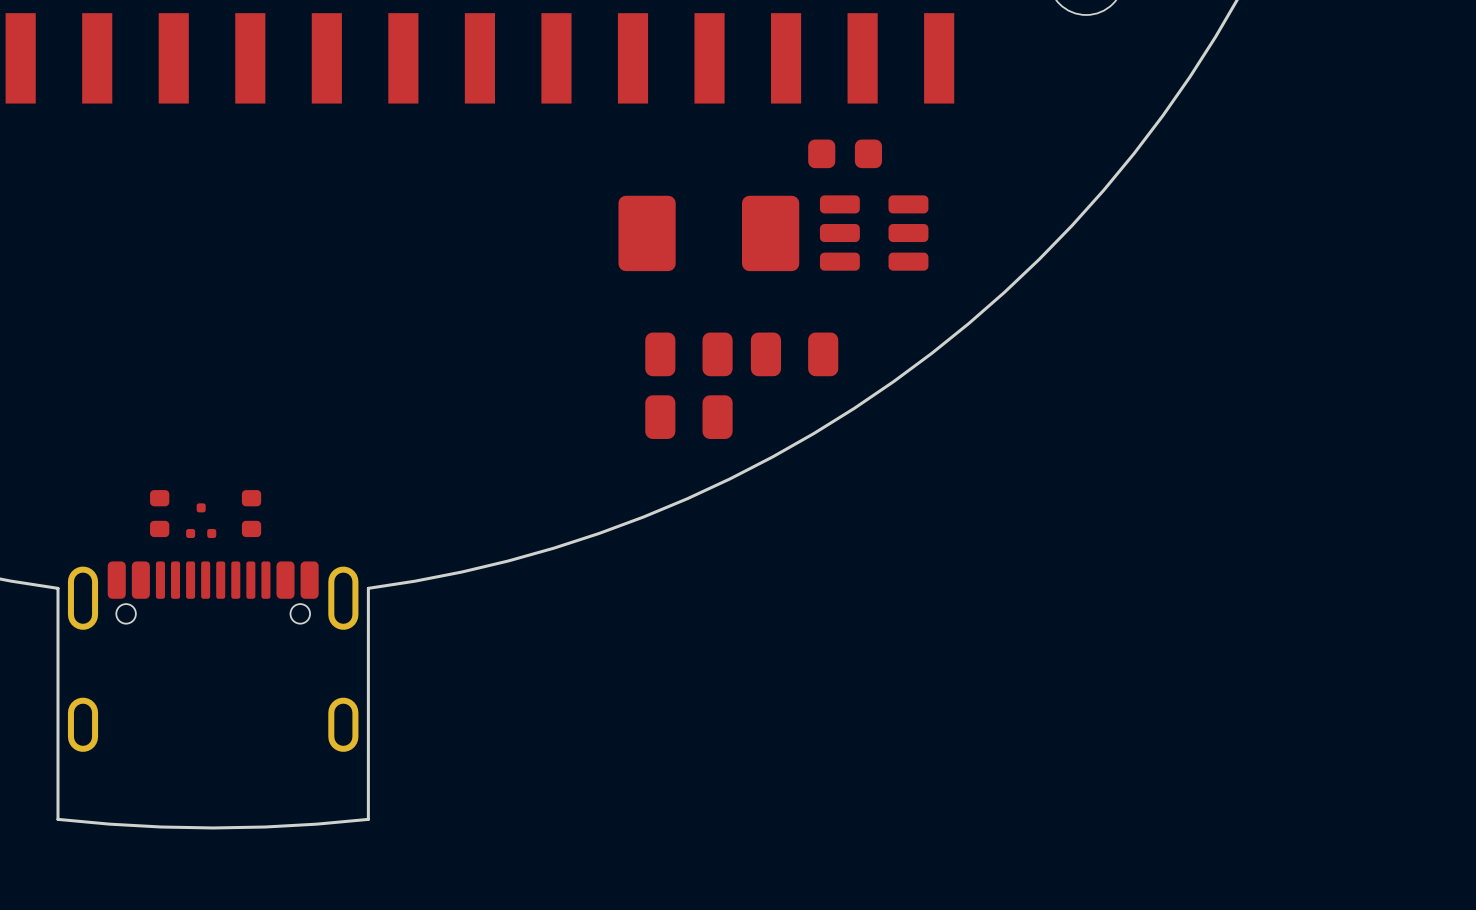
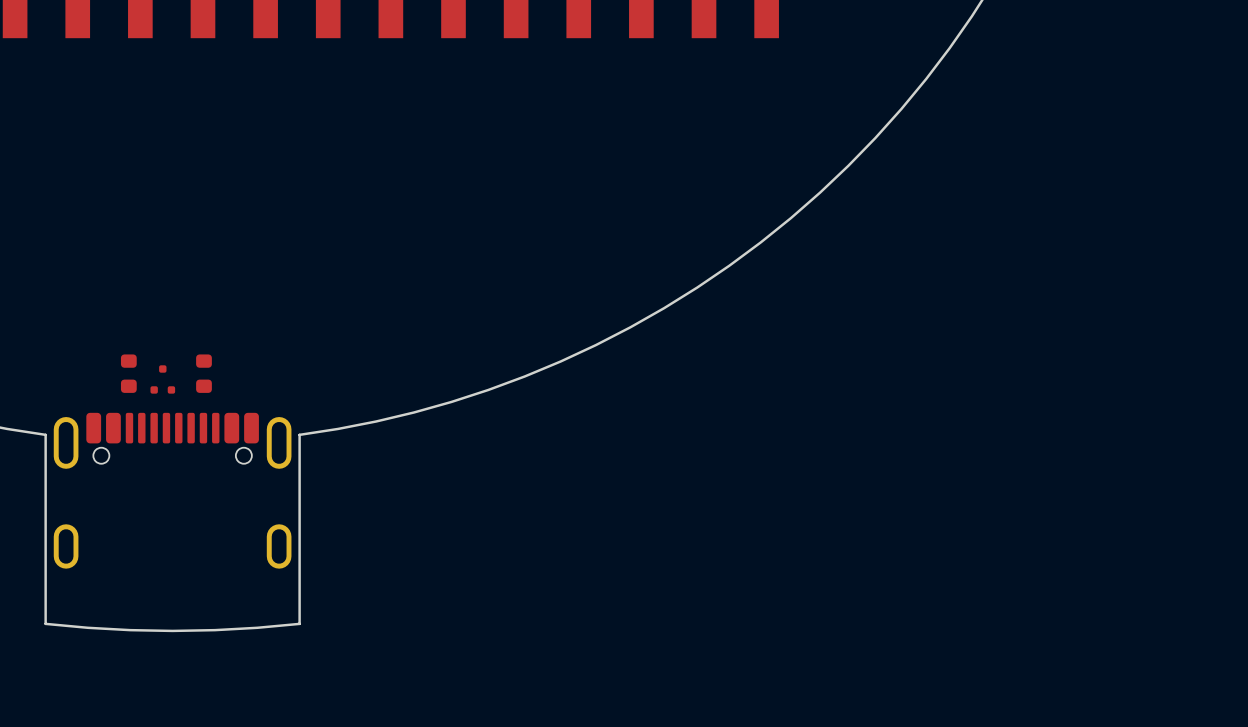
part: (845, 153) -> none
part: (708, 233) -> none
part: (874, 233) -> none
part: (688, 354) -> none
part: (794, 354) -> none
part: (688, 417) -> none

